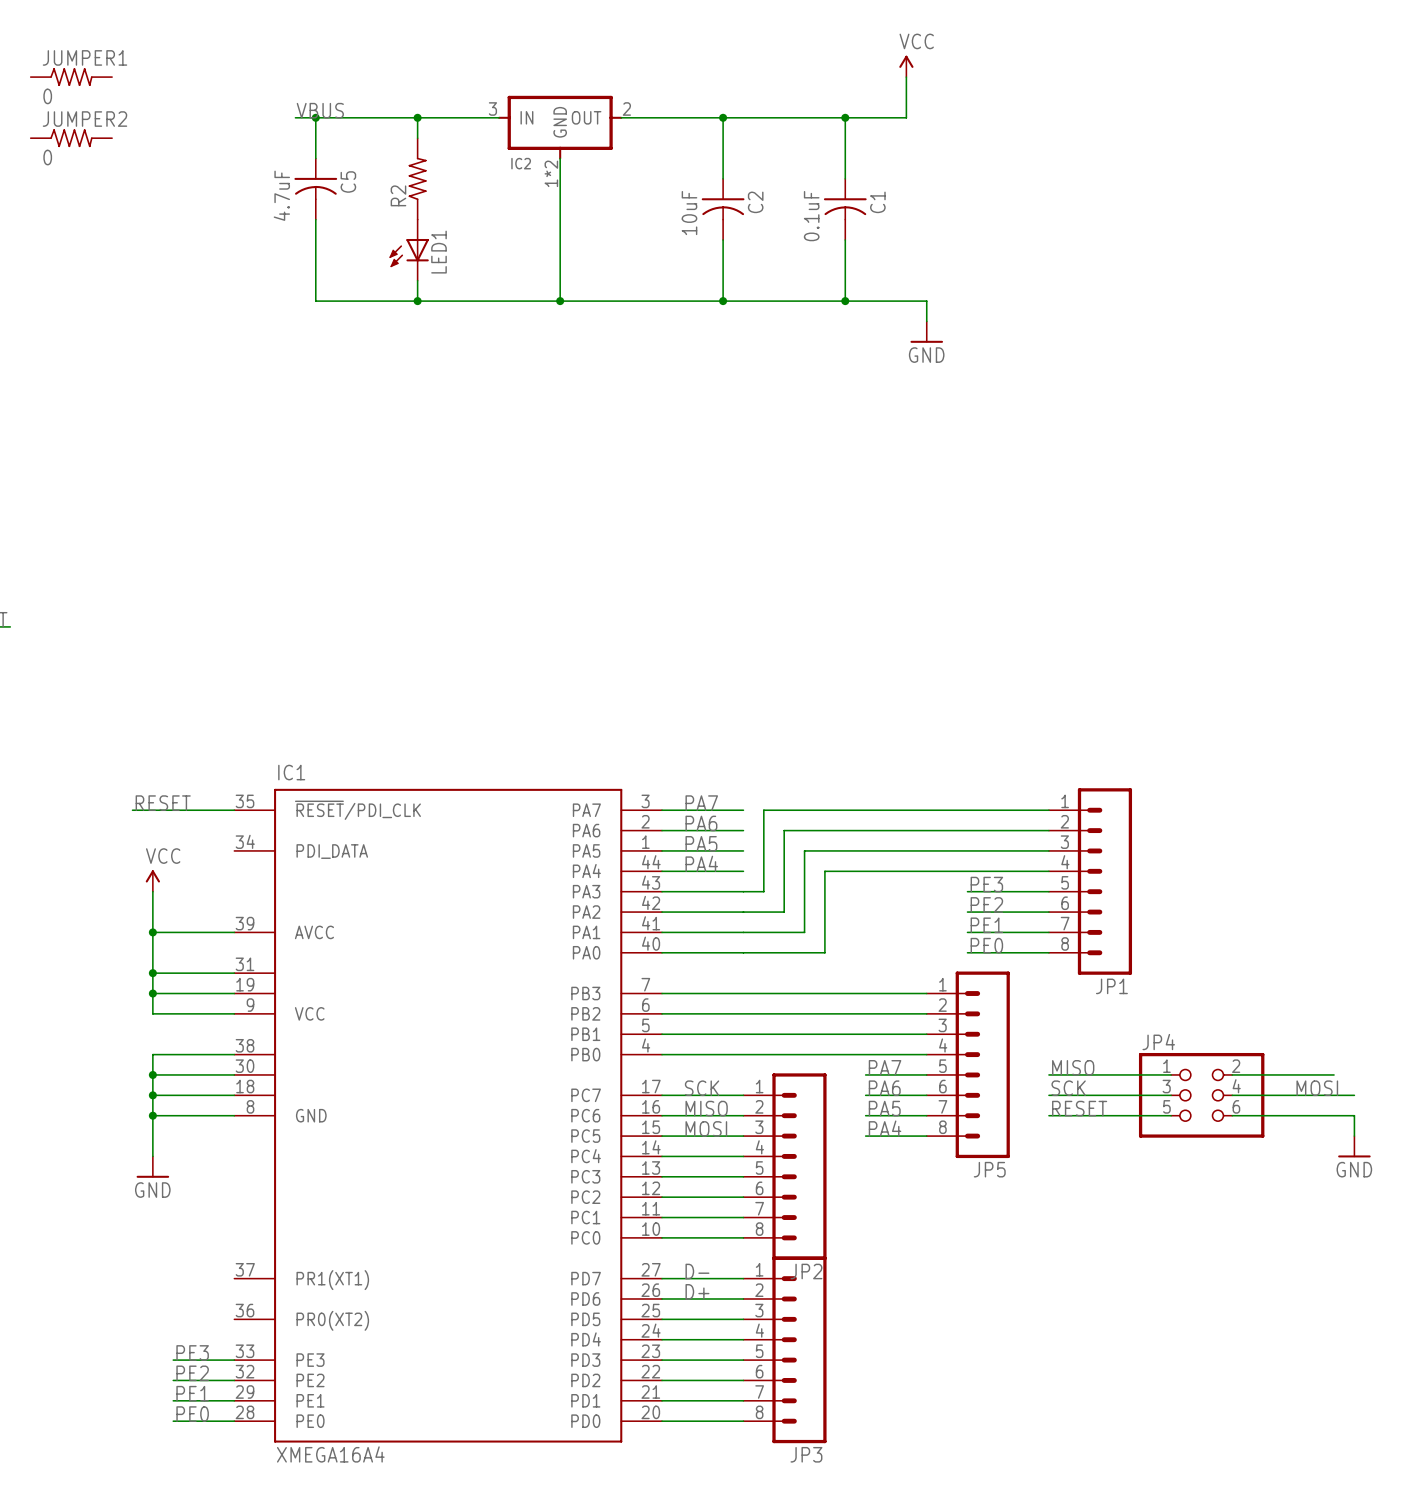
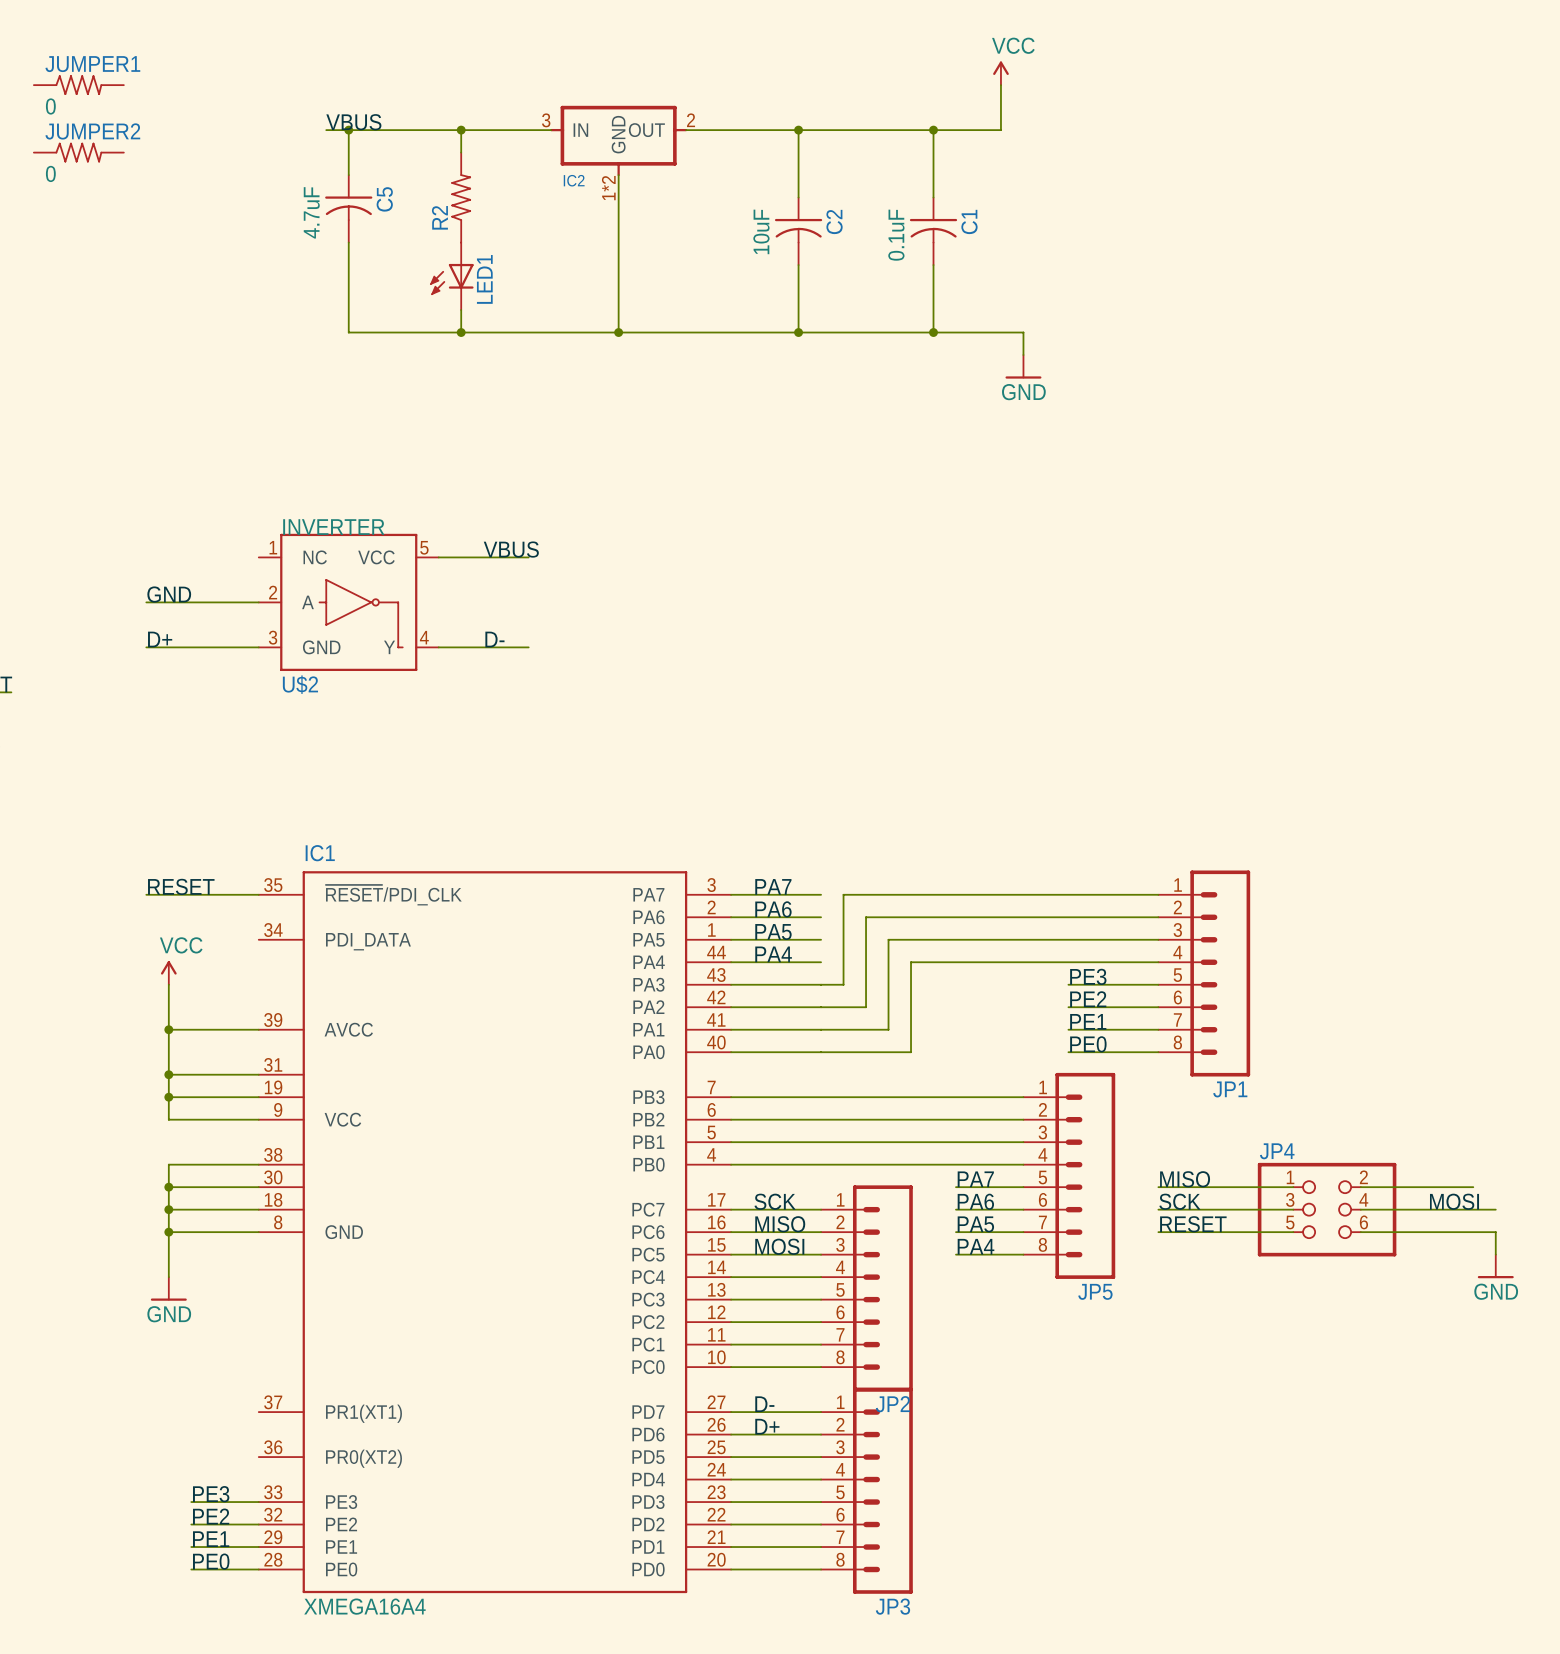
label: none -> VBUS (511, 549)
wire: none -> (438, 557) (528, 557)
label: none -> GND (169, 594)
wire: none -> (146, 602) (258, 602)
U$2: none -> INVERTER (348, 602)
label: none -> D+ (160, 639)
label: none -> D- (494, 639)
wire: none -> (146, 647) (258, 647)
wire: none -> (438, 647) (528, 647)

